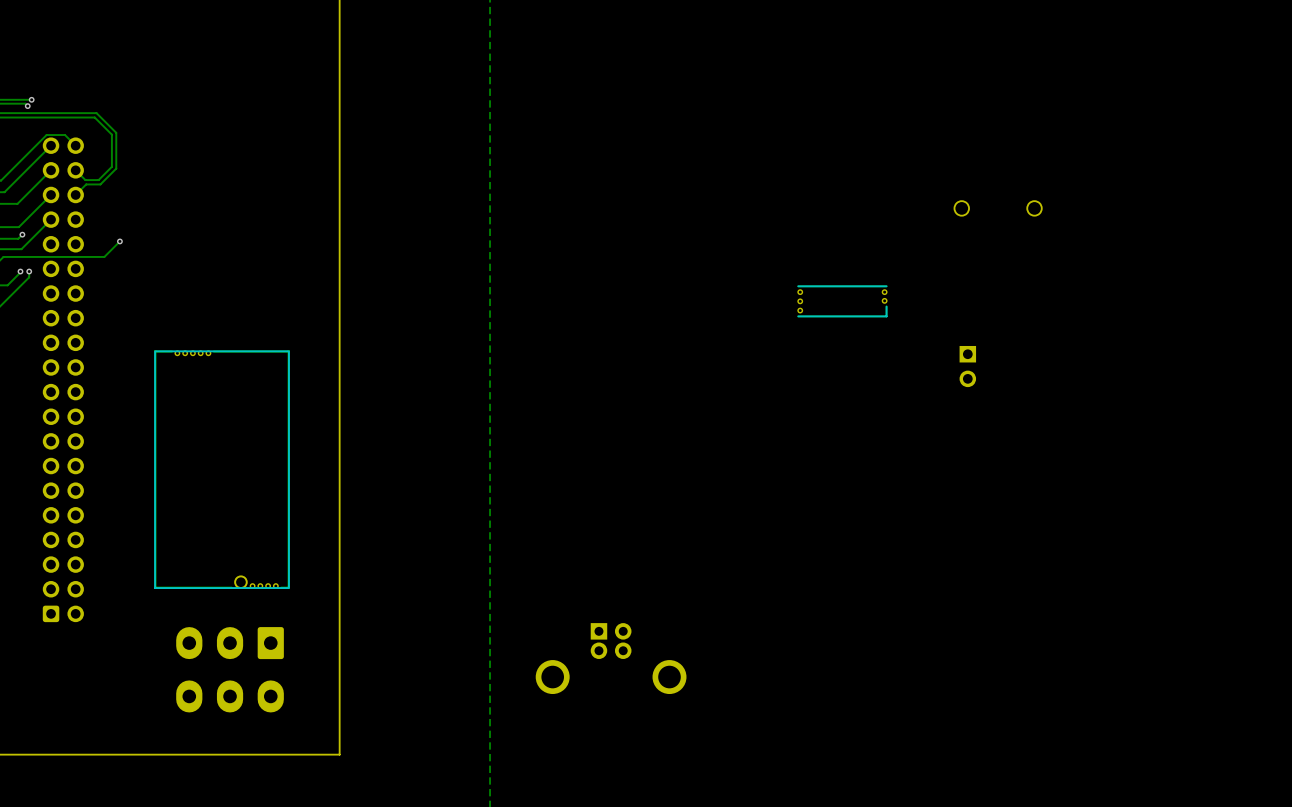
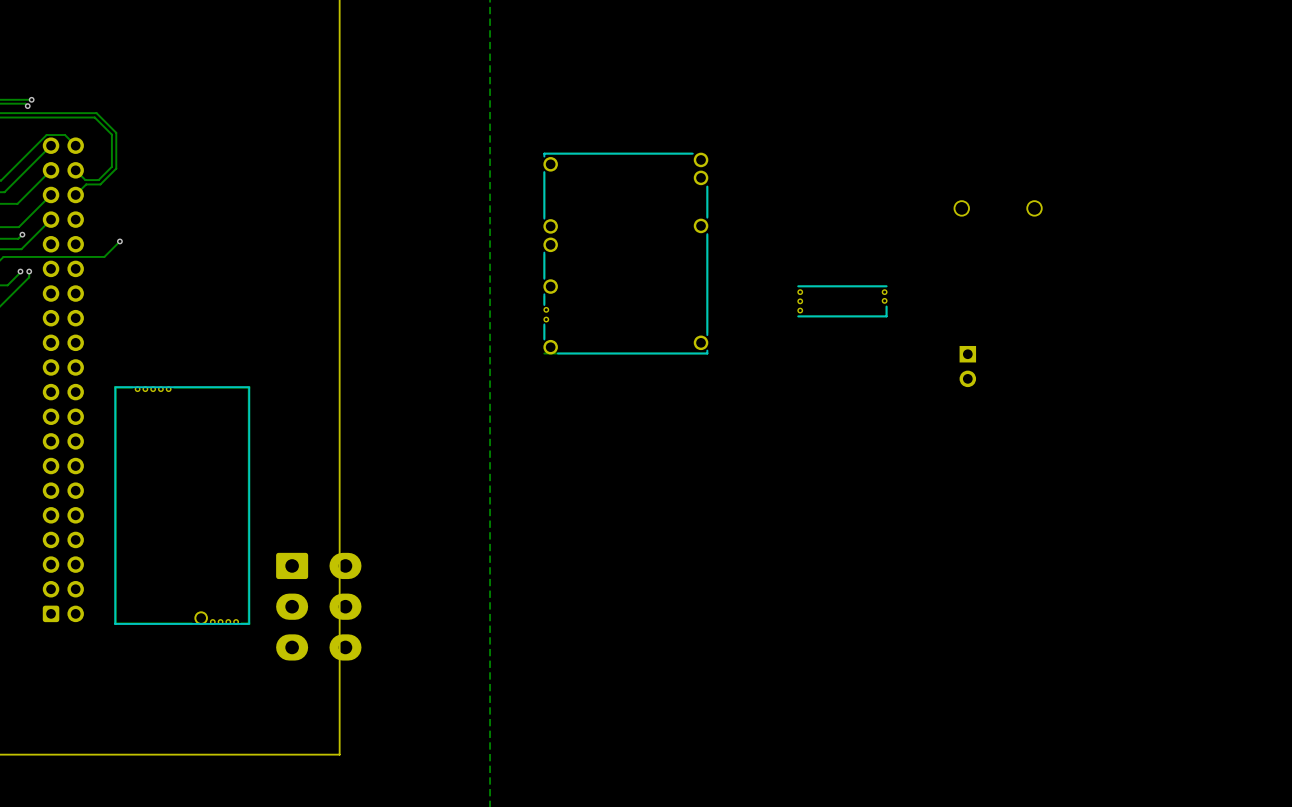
part: none -> (625, 253)
part position: (222, 469) -> (182, 505)
part: (611, 658) -> none
part rotation: 0° (230, 669) -> 90° counterclockwise (318, 606)
part position: (230, 669) -> (318, 606)

